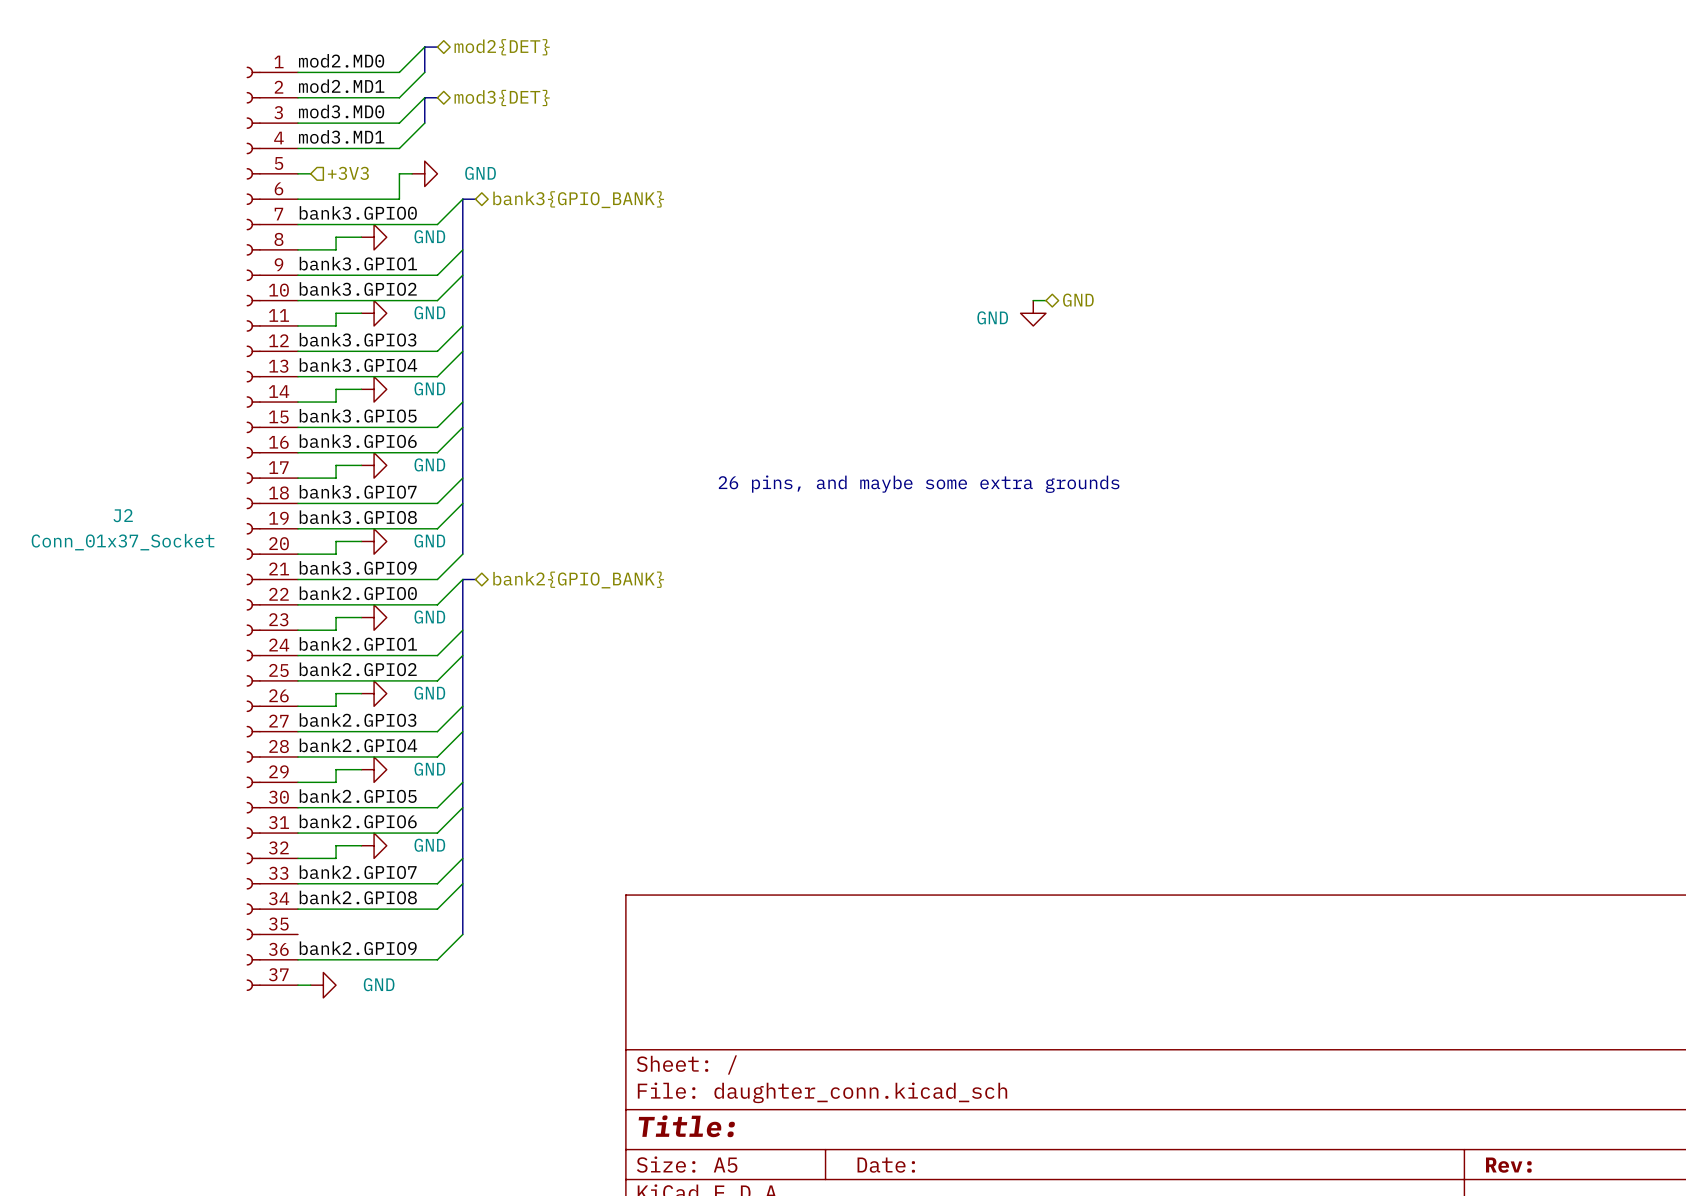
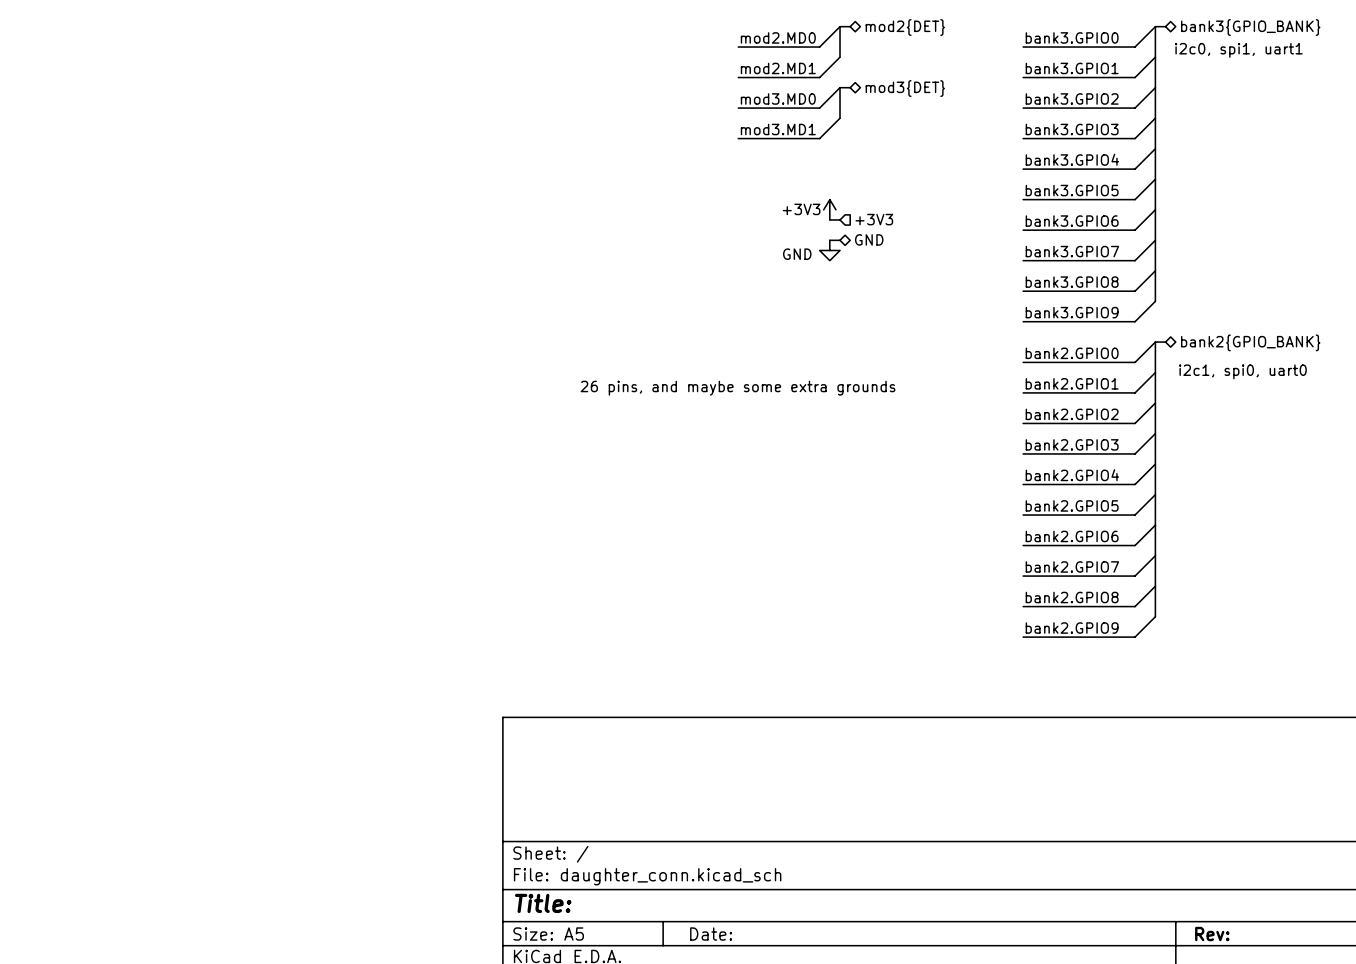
wire: none -> (840, 26) (819, 47) (738, 47)
bus: none -> (850, 26) (840, 26) (840, 57)
hierarchical label: none -> mod2{DET} (905, 27)
wire: none -> (1155, 26) (1135, 47) (1023, 47)
bus: none -> (1165, 26) (1155, 26) (1155, 301)
hierarchical label: none -> bank3{GPIO_BANK} (1250, 27)
wire: (424, 47) (399, 72) (297, 72) -> none
bus: (437, 47) (424, 47) (424, 72) -> none
hierarchical label: mod2{DET} (502, 47) -> none
label: none -> mod2.MD0 (778, 37)
label: none -> bank3.GPIO0 (1072, 37)
label: mod2.MD0 (341, 60) -> none
text: none -> i2c0, spi1, uart1 (1238, 50)
wire: (424, 72) (399, 97) (297, 97) -> none
wire: none -> (840, 57) (819, 77) (738, 77)
wire: none -> (1155, 57) (1135, 77) (1023, 77)
label: mod2.MD1 (341, 86) -> none
label: none -> mod2.MD1 (778, 68)
label: none -> bank3.GPIO1 (1072, 68)
wire: (424, 97) (399, 123) (297, 123) -> none
bus: (437, 97) (424, 97) (424, 123) -> none
hierarchical label: mod3{DET} (502, 97) -> none
wire: none -> (840, 87) (819, 108) (738, 108)
bus: none -> (850, 87) (840, 87) (840, 118)
hierarchical label: none -> mod3{DET} (905, 88)
wire: none -> (1155, 87) (1135, 108) (1023, 108)
label: mod3.MD0 (341, 111) -> none
wire: (424, 123) (399, 148) (297, 148) -> none
label: none -> mod3.MD0 (778, 98)
label: none -> bank3.GPIO2 (1072, 98)
label: mod3.MD1 (341, 136) -> none
wire: none -> (840, 118) (819, 138) (738, 138)
wire: none -> (1155, 118) (1135, 138) (1023, 138)
label: none -> mod3.MD1 (778, 129)
label: none -> bank3.GPIO3 (1072, 129)
wire: (297, 173) (310, 173) -> none
hierarchical label: +3V3 (348, 173) -> none
wire: (412, 173) (399, 173) (399, 199) (297, 199) -> none
power symbol: GND (424, 173) -> none
wire: none -> (1155, 148) (1135, 169) (1023, 169)
wire: (462, 199) (437, 224) (297, 224) -> none
bus: (475, 199) (462, 199) (462, 554) -> none
hierarchical label: bank3{GPIO_BANK} (578, 199) -> none
label: none -> bank3.GPIO4 (1072, 159)
label: bank3.GPIO0 (358, 212) -> none
wire: none -> (1155, 179) (1135, 199) (1023, 199)
wire: (361, 237) (336, 237) (336, 249) (297, 249) -> none
power symbol: GND (374, 237) -> none
label: none -> bank3.GPIO5 (1072, 190)
wire: (462, 249) (437, 275) (297, 275) -> none
power symbol: none -> +3V3 (829, 209)
wire: none -> (1155, 209) (1135, 230) (1023, 230)
label: bank3.GPIO1 (358, 263) -> none
hierarchical label: none -> +3V3 (874, 219)
wire: (462, 275) (437, 300) (297, 300) -> none
wire: none -> (829, 219) (840, 219)
label: none -> bank3.GPIO6 (1072, 221)
label: bank3.GPIO2 (358, 289) -> none
wire: none -> (1155, 240) (1135, 260) (1023, 260)
wire: (361, 313) (336, 313) (336, 325) (297, 325) -> none
power symbol: GND (374, 313) -> none
label: none -> bank3.GPIO7 (1072, 251)
wire: (462, 325) (437, 351) (297, 351) -> none
wire: none -> (1155, 270) (1135, 291) (1023, 291)
label: bank3.GPIO3 (358, 339) -> none
wire: (462, 351) (437, 376) (297, 376) -> none
label: none -> bank3.GPIO8 (1072, 282)
label: bank3.GPIO4 (358, 365) -> none
wire: none -> (1155, 301) (1135, 321) (1023, 321)
wire: (361, 389) (336, 389) (336, 402) (297, 402) -> none
power symbol: GND (374, 389) -> none
label: none -> bank3.GPIO9 (1072, 312)
wire: (462, 402) (437, 427) (297, 427) -> none
label: bank3.GPIO5 (358, 415) -> none
wire: (462, 427) (437, 452) (297, 452) -> none
wire: none -> (1155, 342) (1135, 362) (1023, 362)
bus: none -> (1165, 342) (1155, 342) (1155, 616)
hierarchical label: none -> bank2{GPIO_BANK} (1250, 342)
label: bank3.GPIO6 (358, 441) -> none
label: none -> bank2.GPIO0 (1072, 353)
text: none -> i2c1, spi0, uart0 (1242, 371)
wire: (361, 465) (336, 465) (336, 478) (297, 478) -> none
power symbol: GND (374, 465) -> none
wire: none -> (1155, 372) (1135, 392) (1023, 392)
wire: (462, 478) (437, 503) (297, 503) -> none
label: none -> bank2.GPIO1 (1072, 383)
label: bank3.GPIO7 (358, 491) -> none
wire: (462, 503) (437, 528) (297, 528) -> none
wire: none -> (1155, 403) (1135, 423) (1023, 423)
label: bank3.GPIO8 (358, 517) -> none
label: none -> bank2.GPIO2 (1072, 414)
J2: Conn_01x37_Socket (272, 528) -> none
wire: (361, 541) (336, 541) (336, 554) (297, 554) -> none
power symbol: GND (374, 541) -> none
wire: none -> (1155, 433) (1135, 453) (1023, 453)
wire: (462, 554) (437, 579) (297, 579) -> none
label: none -> bank2.GPIO3 (1072, 444)
label: bank3.GPIO9 (358, 567) -> none
wire: (462, 579) (437, 604) (297, 604) -> none
bus: (475, 579) (462, 579) (462, 934) -> none
wire: none -> (1155, 464) (1135, 484) (1023, 484)
hierarchical label: bank2{GPIO_BANK} (578, 580) -> none
label: bank2.GPIO0 (358, 593) -> none
label: none -> bank2.GPIO4 (1072, 475)
wire: (361, 617) (336, 617) (336, 630) (297, 630) -> none
power symbol: GND (374, 617) -> none
wire: none -> (1155, 494) (1135, 515) (1023, 515)
wire: (462, 630) (437, 655) (297, 655) -> none
label: none -> bank2.GPIO5 (1072, 505)
label: bank2.GPIO1 (358, 643) -> none
wire: (462, 655) (437, 680) (297, 680) -> none
wire: none -> (1155, 525) (1135, 545) (1023, 545)
label: bank2.GPIO2 (358, 669) -> none
label: none -> bank2.GPIO6 (1072, 536)
wire: (361, 693) (336, 693) (336, 706) (297, 706) -> none
power symbol: GND (374, 693) -> none
wire: none -> (1155, 555) (1135, 576) (1023, 576)
wire: (462, 706) (437, 731) (297, 731) -> none
label: none -> bank2.GPIO7 (1072, 566)
label: bank2.GPIO3 (358, 720) -> none
wire: (462, 731) (437, 756) (297, 756) -> none
wire: none -> (1155, 586) (1135, 606) (1023, 606)
label: bank2.GPIO4 (358, 745) -> none
label: none -> bank2.GPIO8 (1072, 597)
wire: (361, 769) (336, 769) (336, 782) (297, 782) -> none
power symbol: GND (374, 769) -> none
wire: none -> (1155, 616) (1135, 637) (1023, 637)
wire: (462, 782) (437, 807) (297, 807) -> none
label: none -> bank2.GPIO9 (1072, 628)
label: bank2.GPIO5 (358, 796) -> none
wire: (462, 807) (437, 833) (297, 833) -> none
label: bank2.GPIO6 (358, 821) -> none
wire: (361, 845) (336, 845) (336, 858) (297, 858) -> none
power symbol: GND (374, 845) -> none
wire: (462, 858) (437, 883) (297, 883) -> none
label: bank2.GPIO7 (358, 872) -> none
wire: (462, 883) (437, 909) (297, 909) -> none
label: bank2.GPIO8 (358, 897) -> none
wire: (462, 934) (437, 959) (297, 959) -> none
label: bank2.GPIO9 (358, 948) -> none
wire: (297, 985) (310, 985) -> none
power symbol: GND (323, 985) -> none

